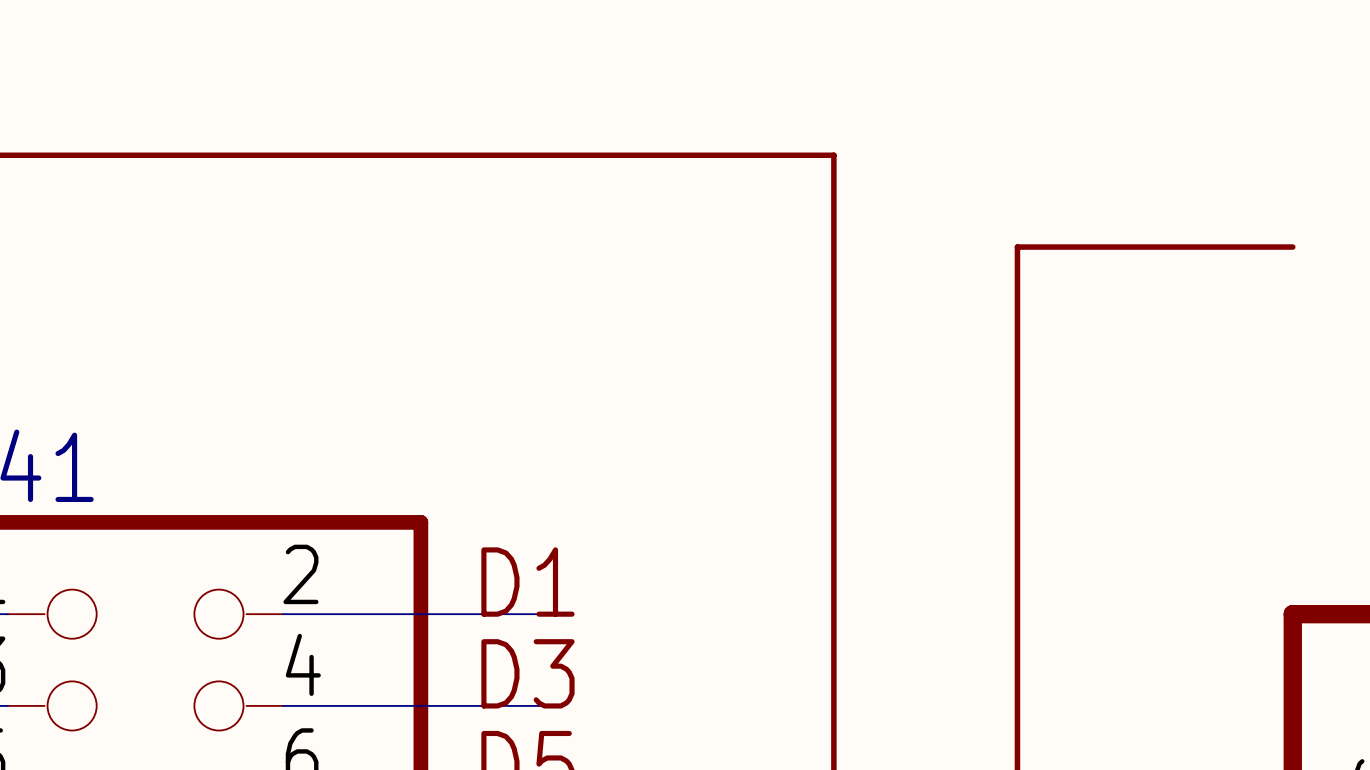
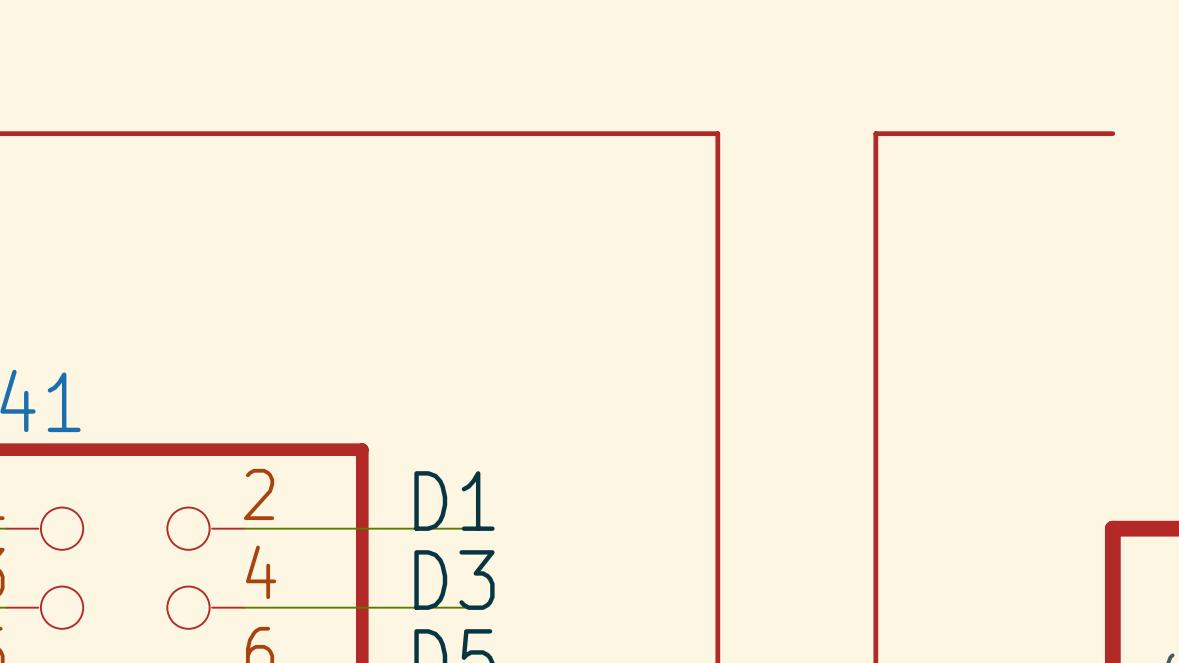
line: (1017, 247) (1292, 247) -> (875, 212) (875, 133) (1112, 133)

